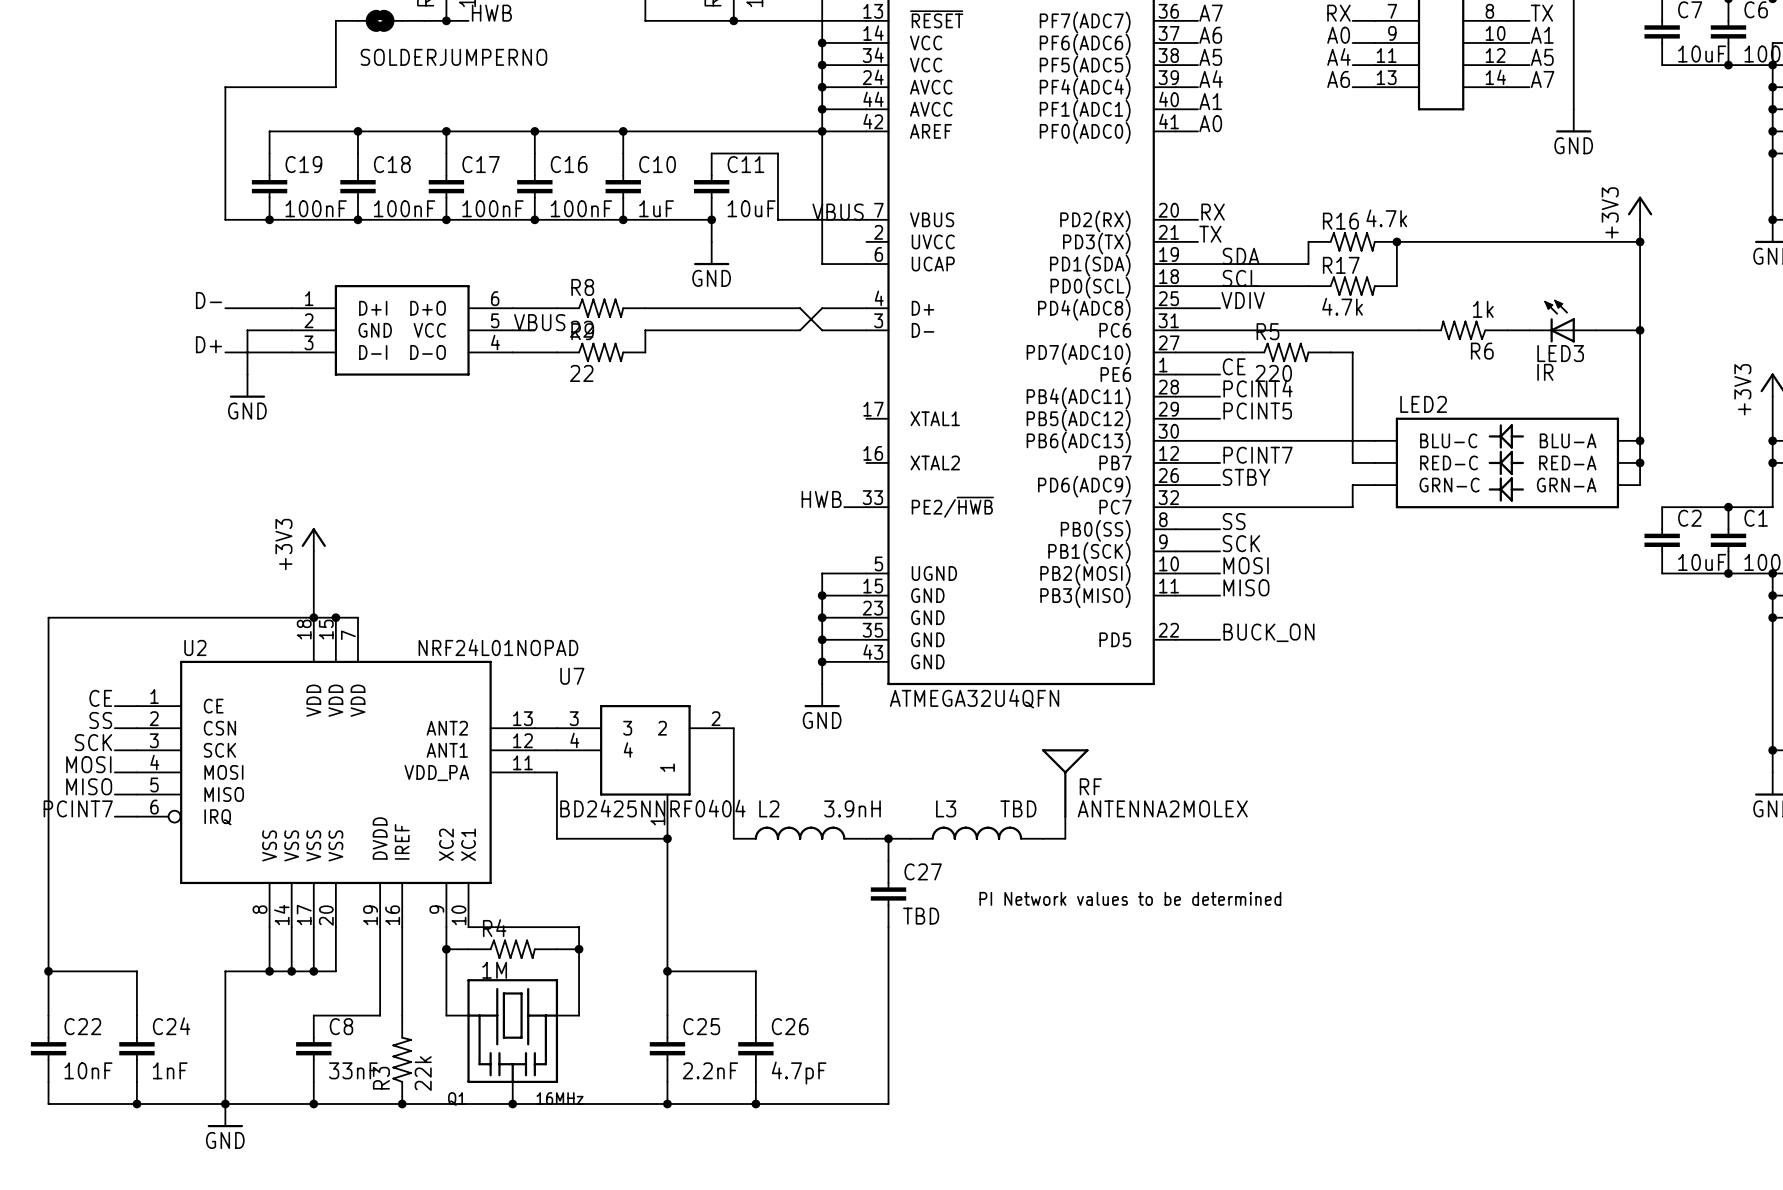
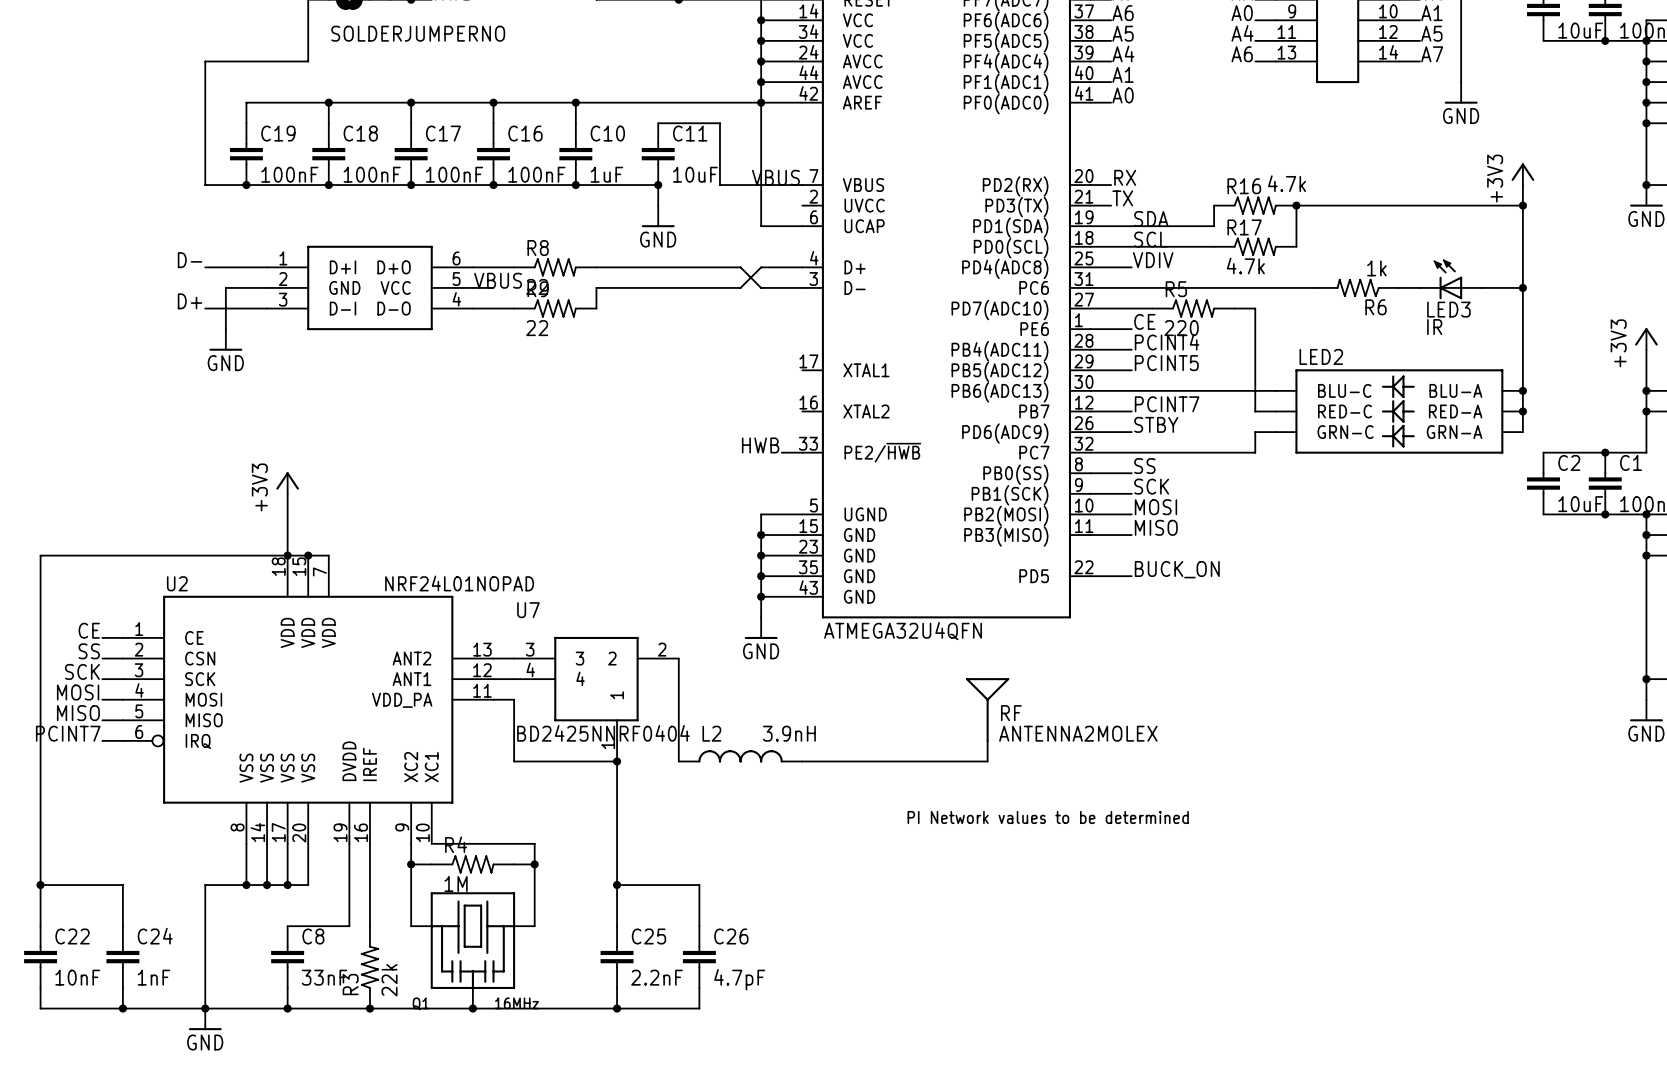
L3: TBD (976, 833) -> none
wire: (888, 838) (888, 860) -> none
junction: (888, 838) -> none
wire: none -> (843, 761) (967, 761)
C27: TBD (888, 894) -> none
wire: (888, 927) (888, 1104) (755, 1104) -> none
junction: (755, 1104) -> none

